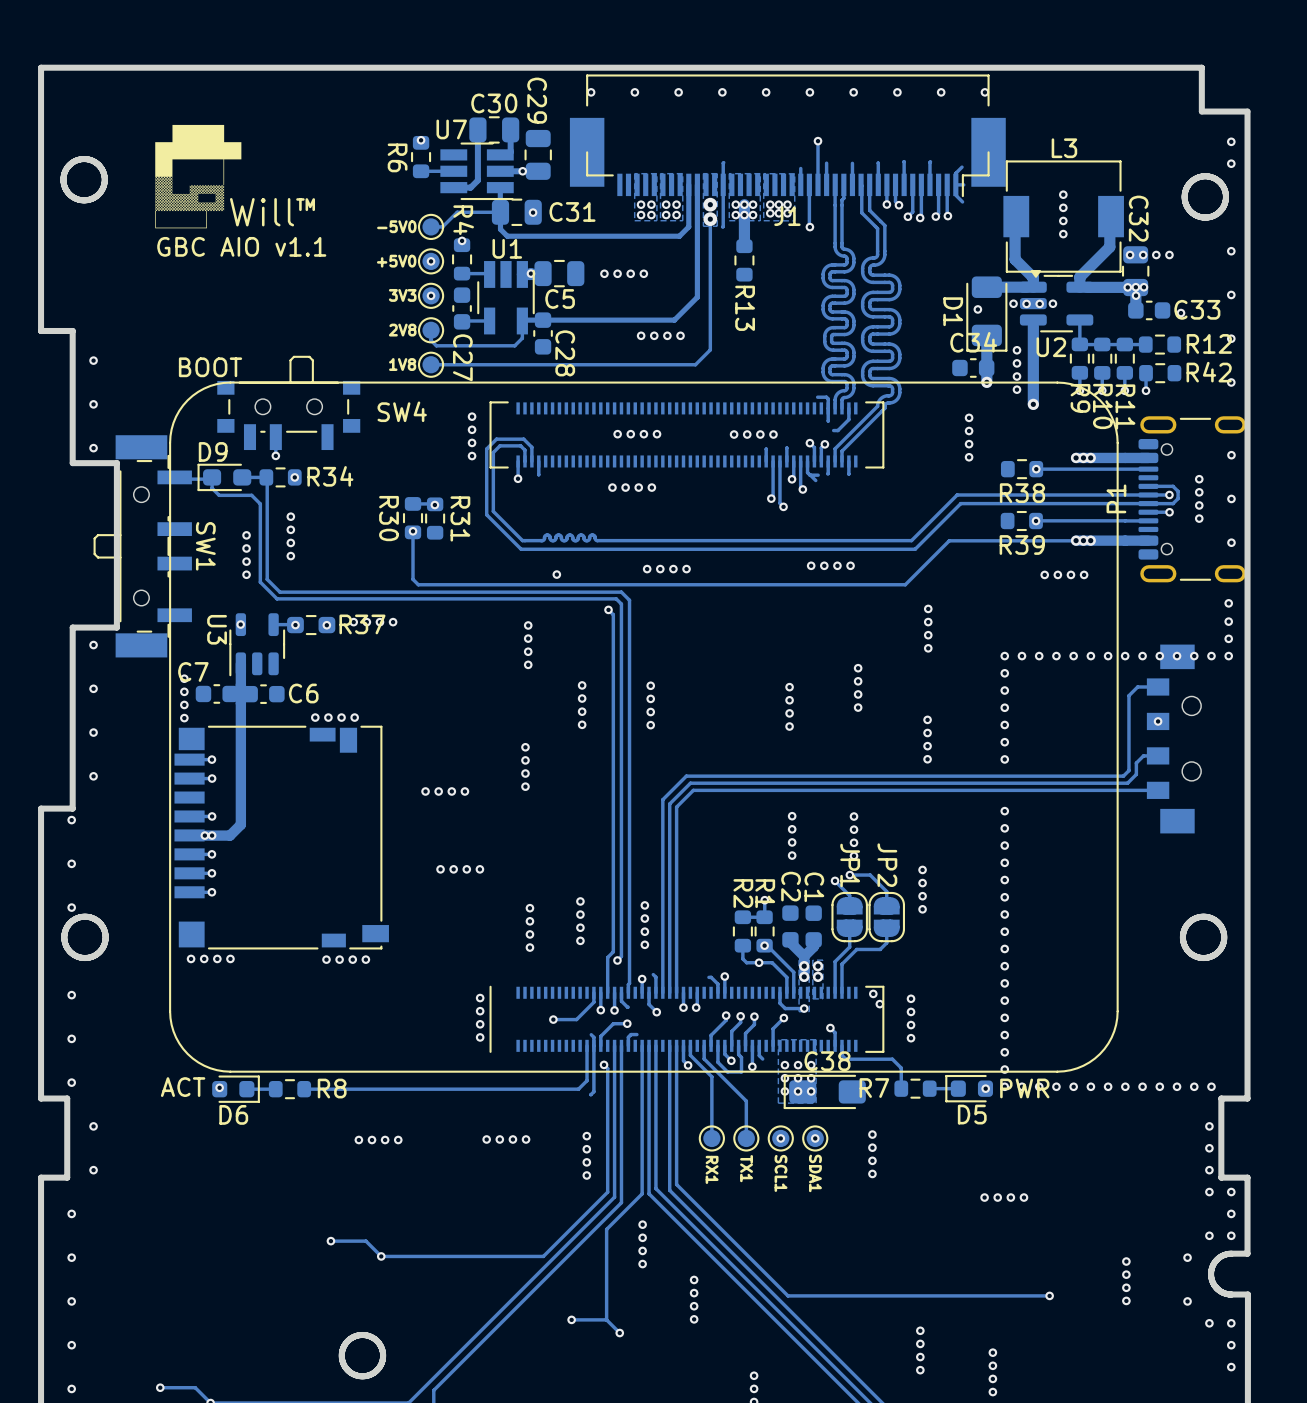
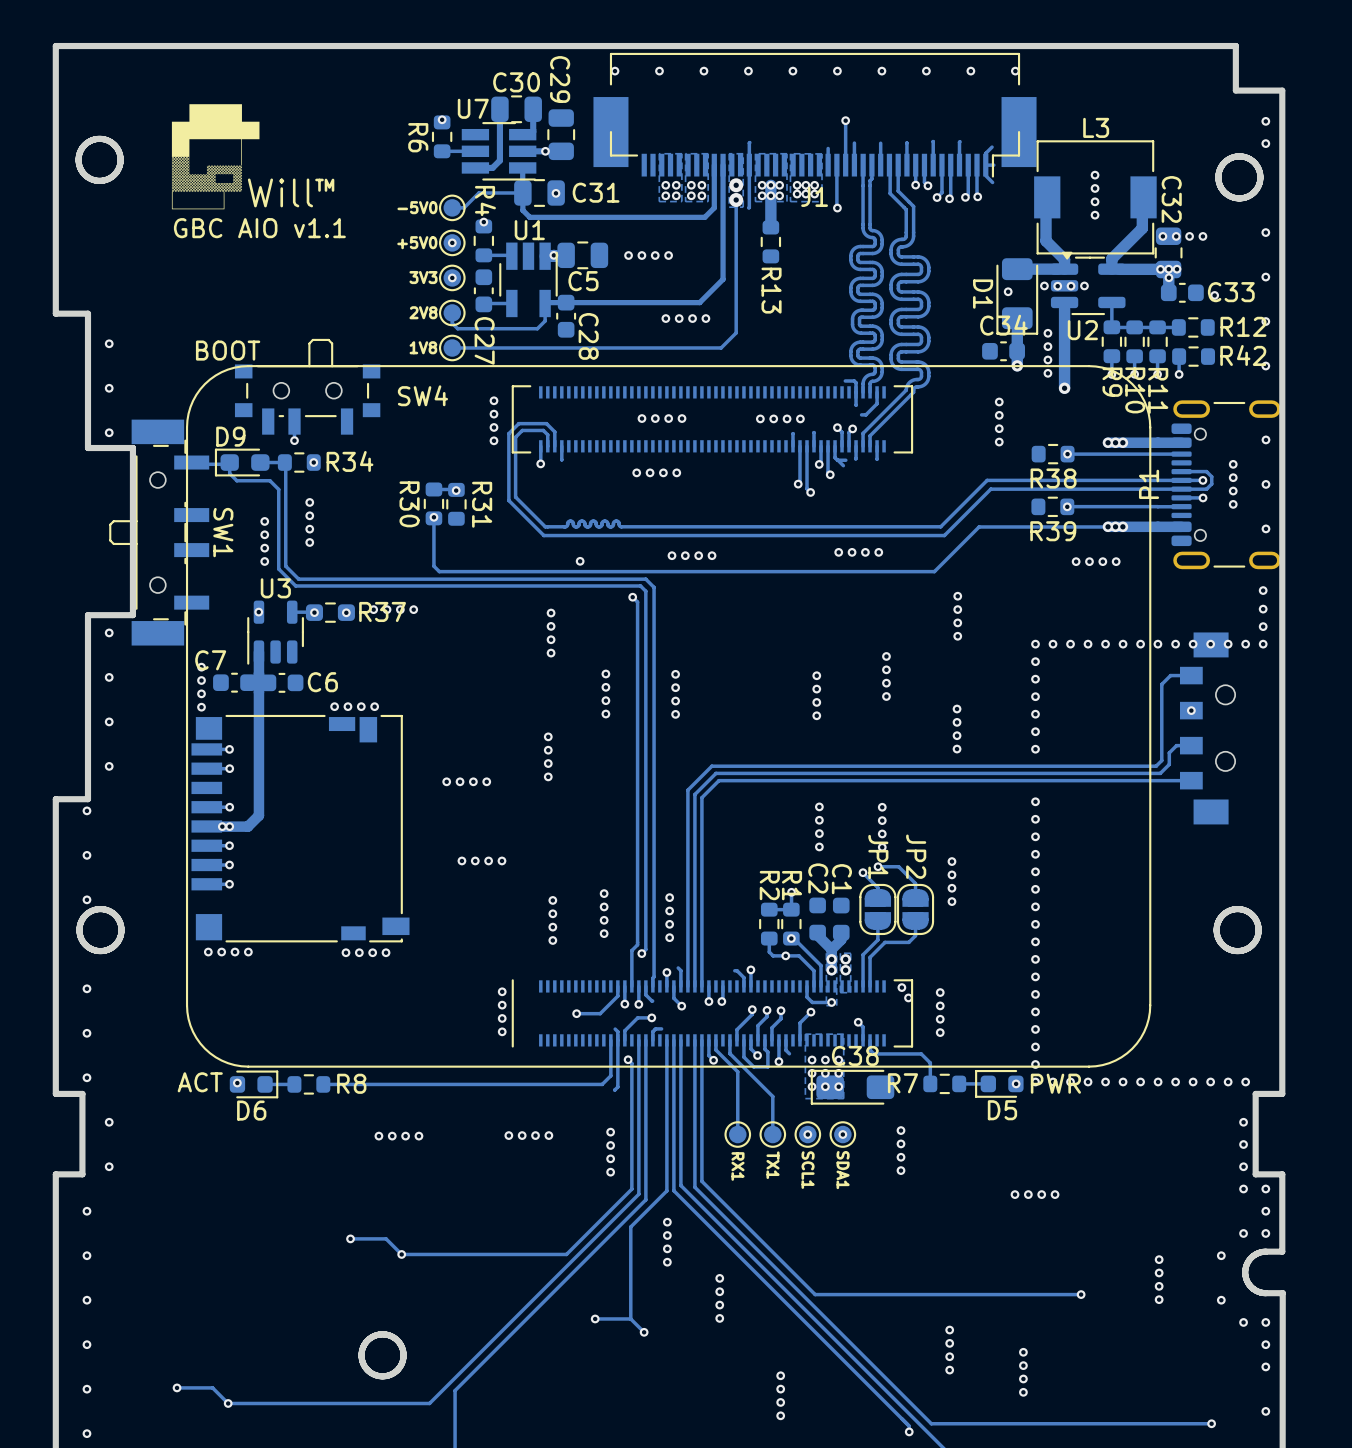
U3 name rotation: 0° (217, 629) -> 90° counterclockwise (275, 588)
U3 name position: U3 (217, 629) -> U3 (275, 588)

